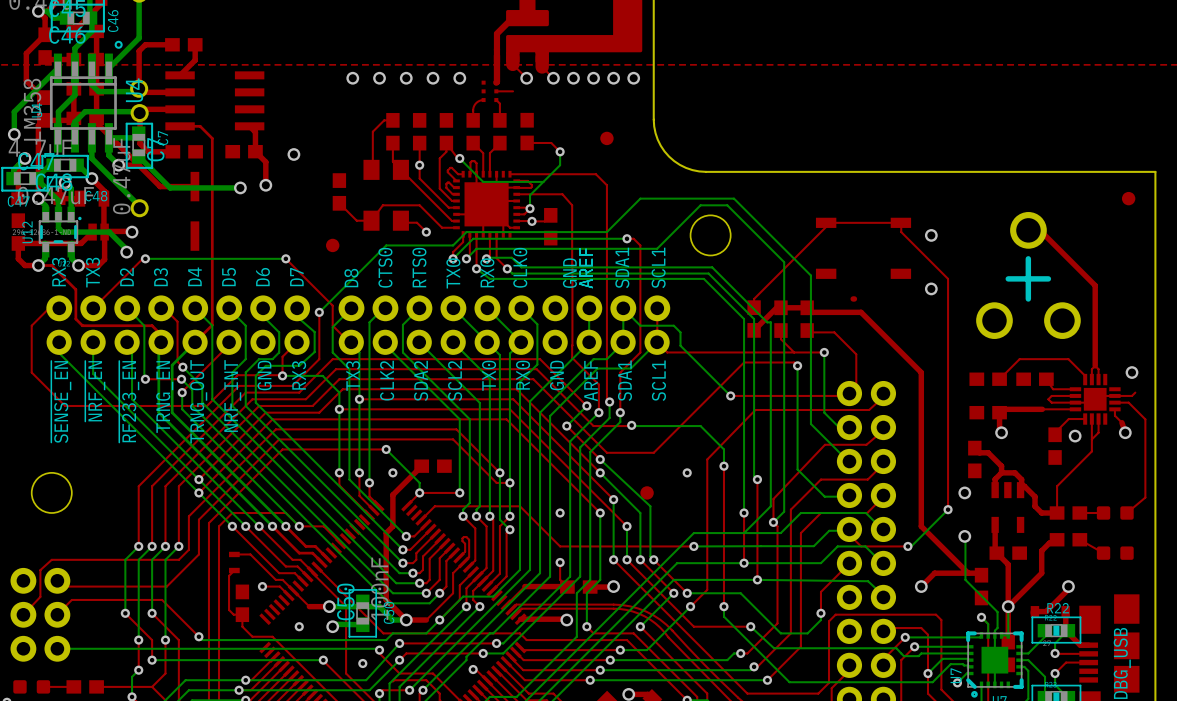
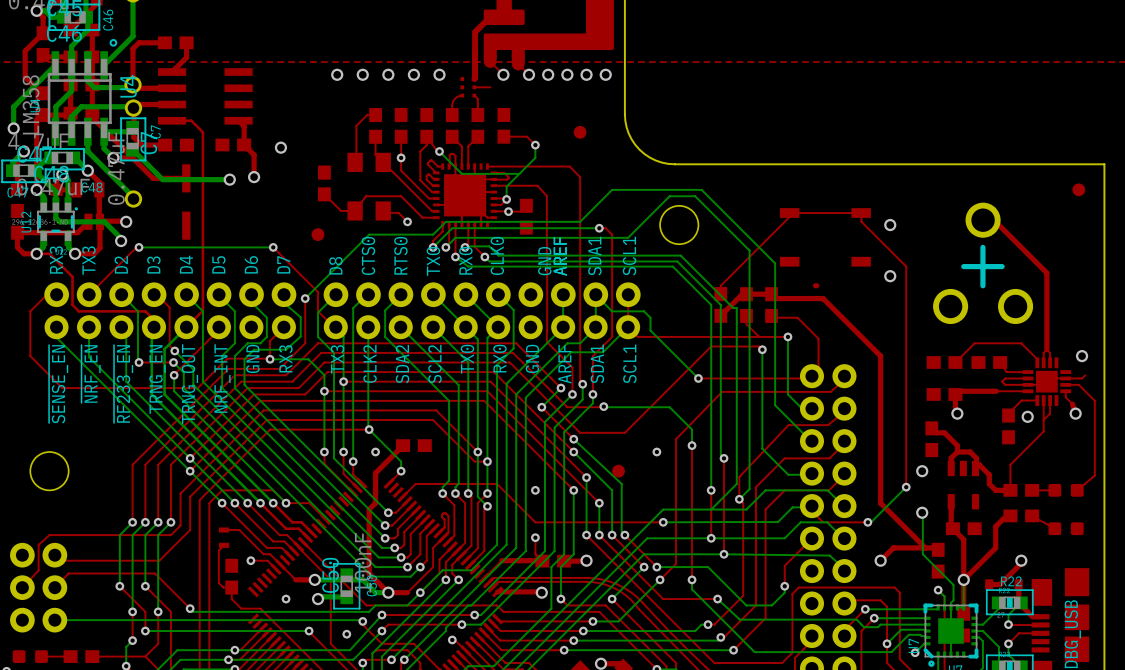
bottom track: (385, 344) (459, 419) (459, 492) -> (368, 329) (369, 429)
top track: (459, 492) (419, 492) -> none
via: (459, 492) -> none

